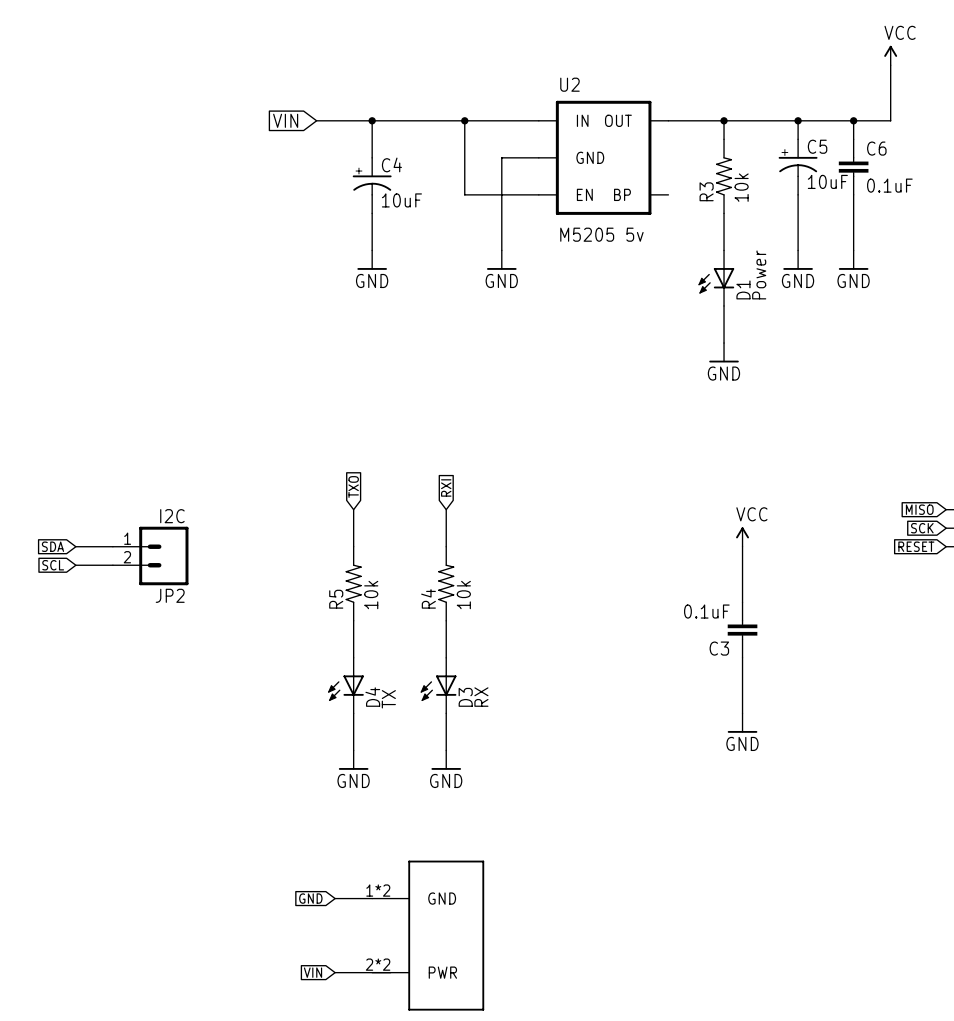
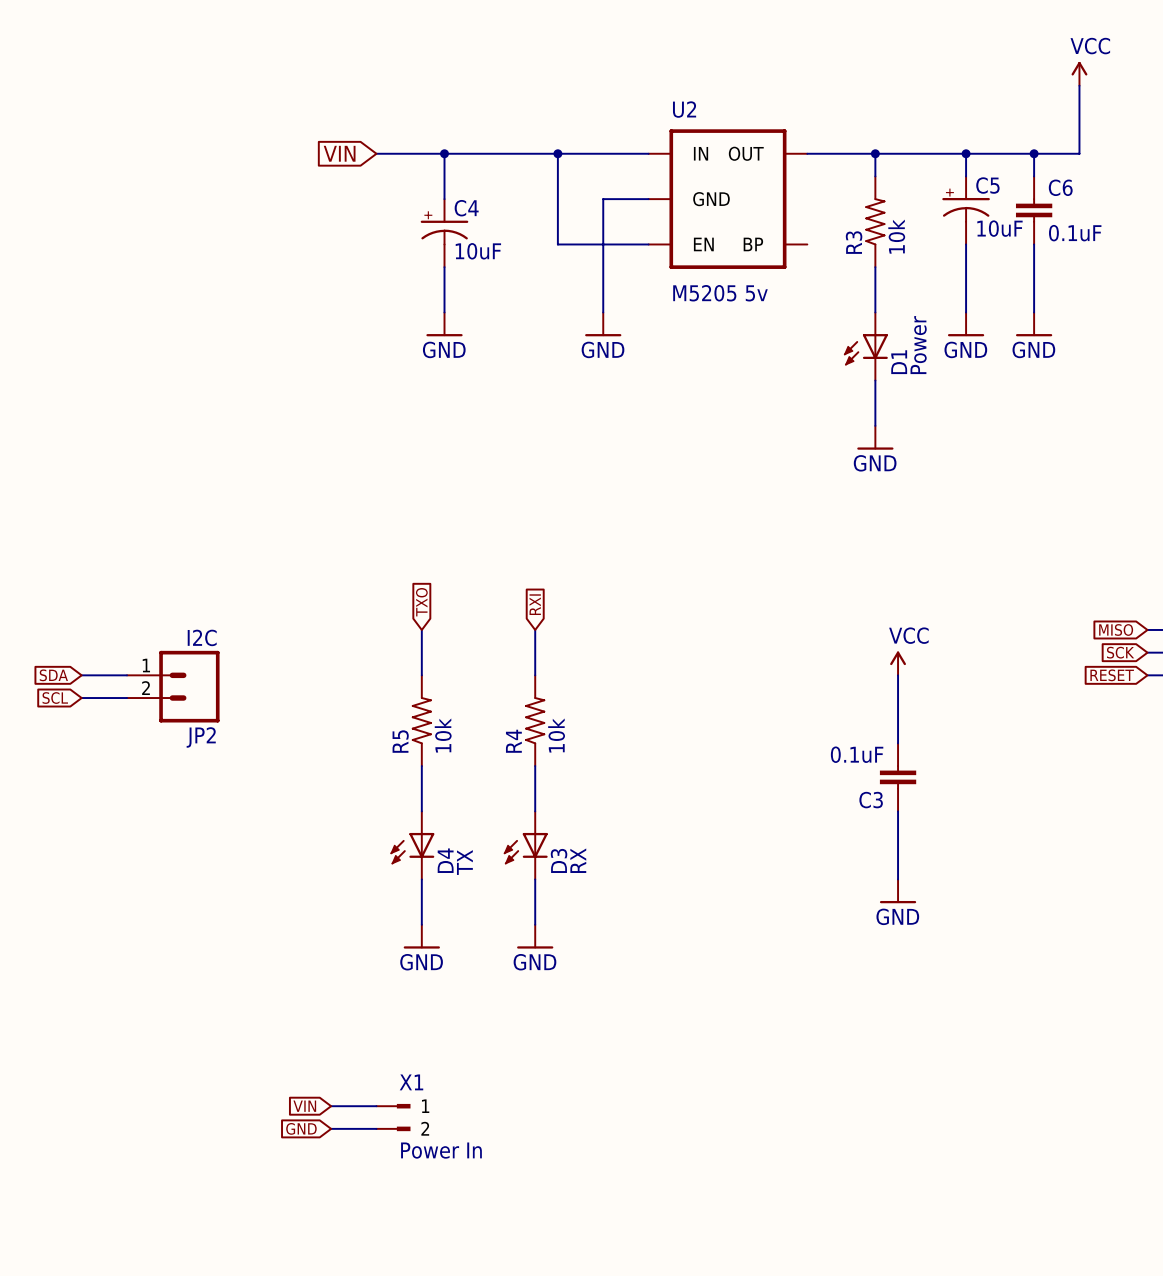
global label position: GND (310, 898) -> GND (301, 1128)
wire: (335, 898) (372, 898) -> (331, 1106) (376, 1106)
X1: none -> Power In (393, 1117)
wire: none -> (331, 1128) (376, 1128)
part: (428, 935) -> none
global label position: VIN (313, 972) -> VIN (304, 1106)
wire: (335, 972) (390, 972) -> none

